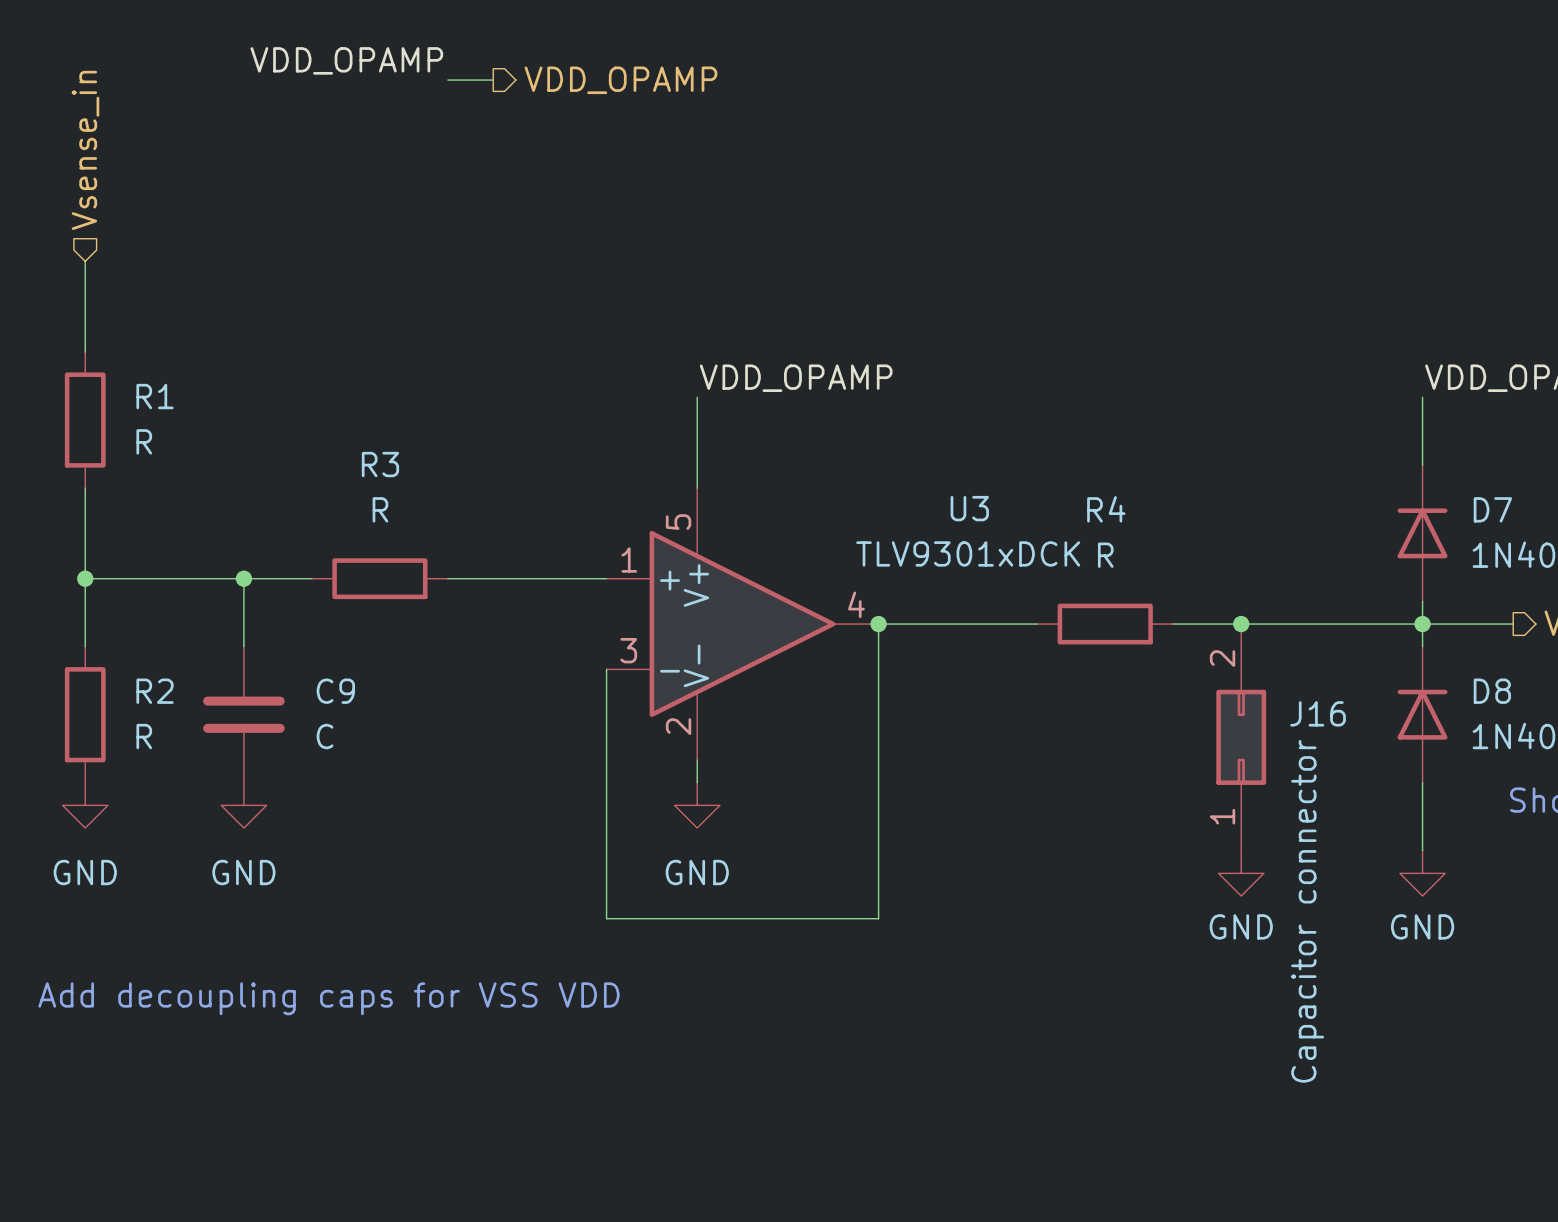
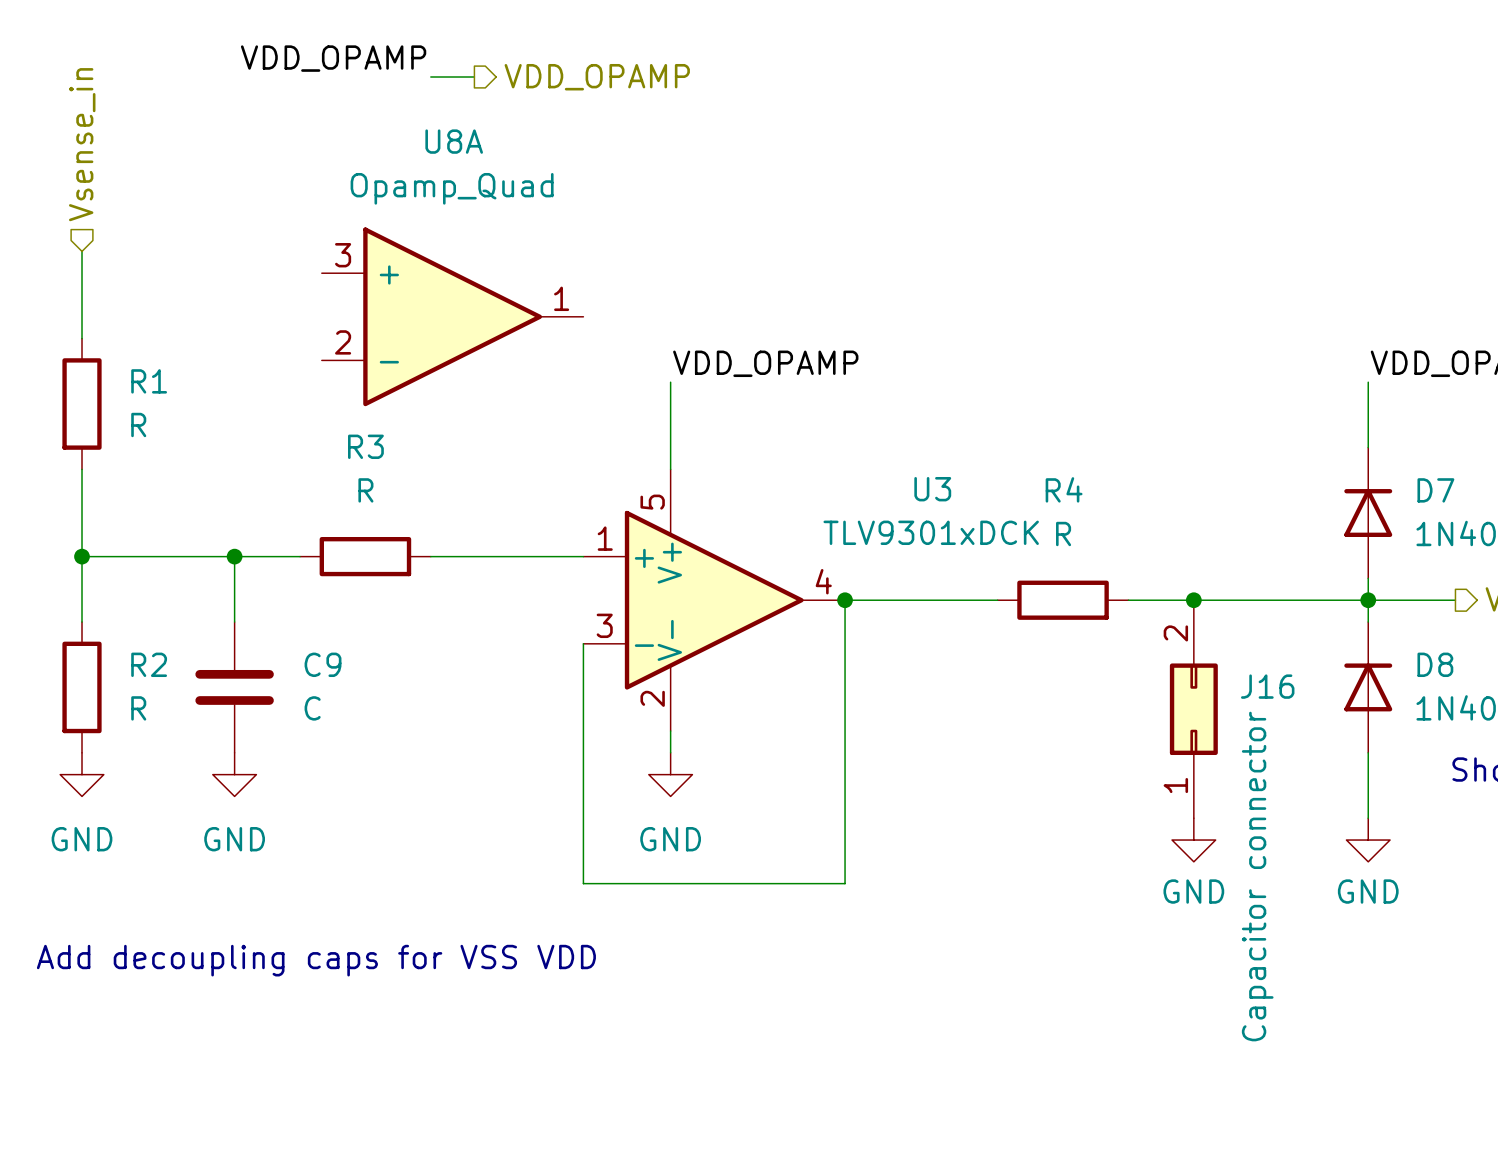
U8A: none -> Opamp_Quad (452, 316)

